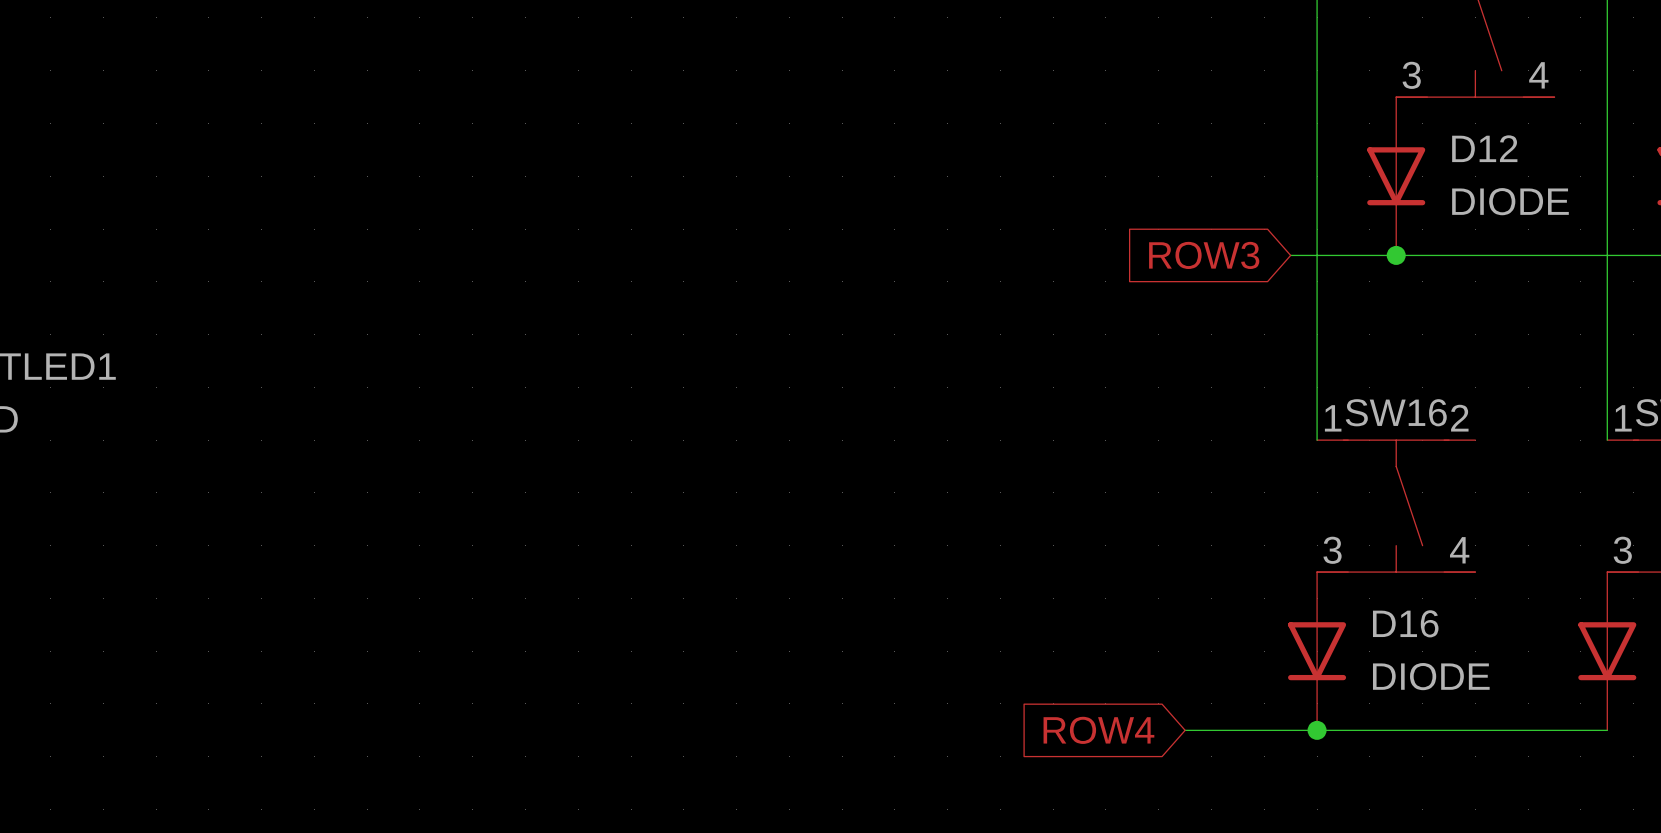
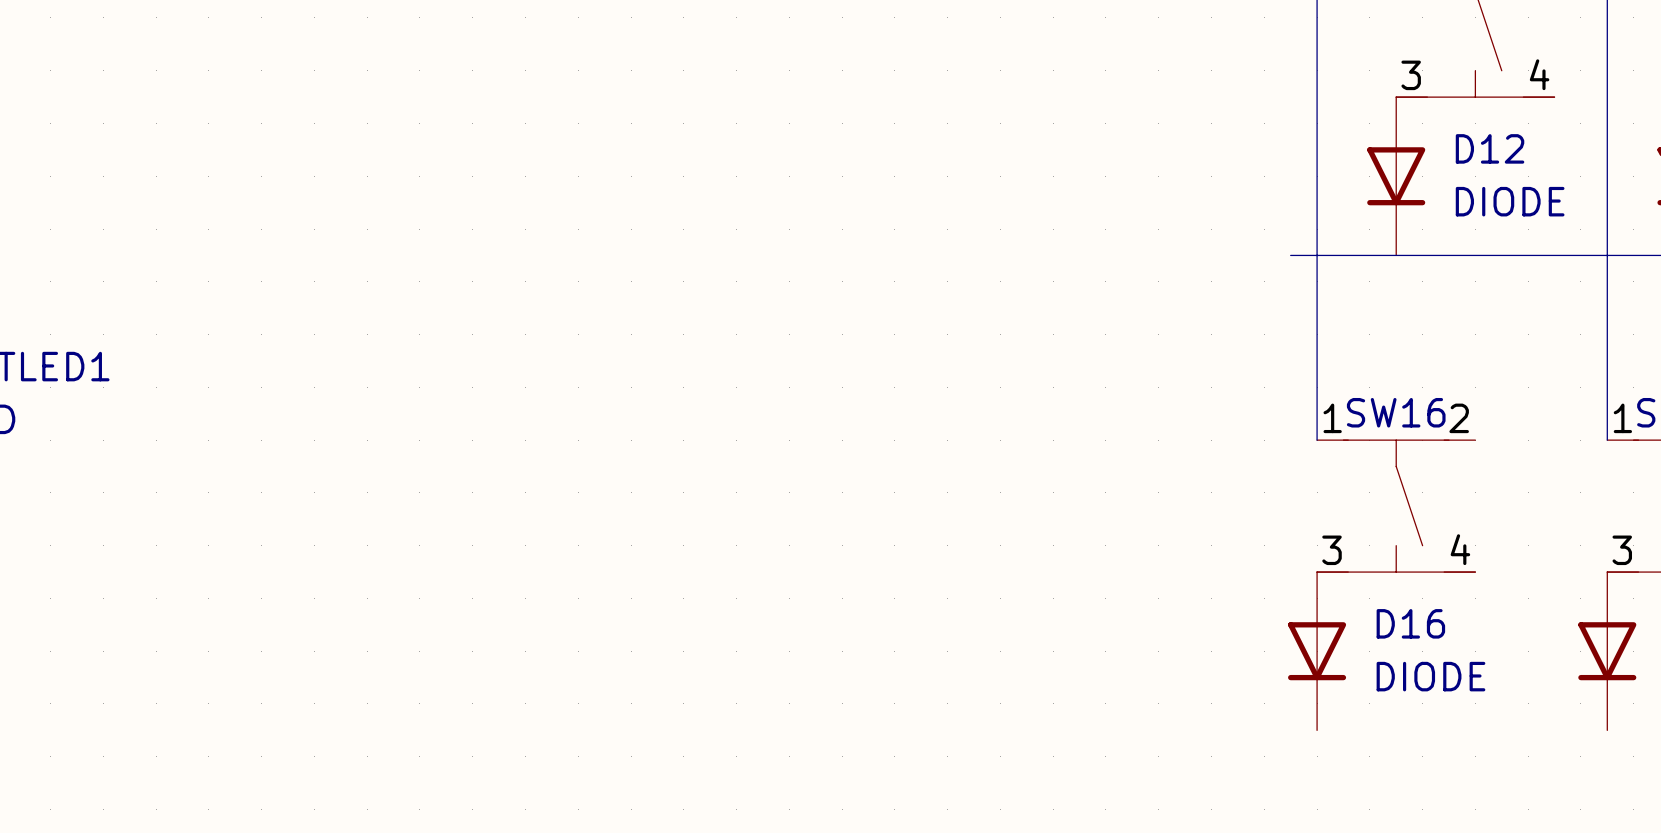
global label: ROW3 (1204, 255) -> none
junction: (1396, 255) -> none
global label: ROW4 (1098, 730) -> none
wire: (1185, 730) (1607, 730) -> none
junction: (1317, 730) -> none

